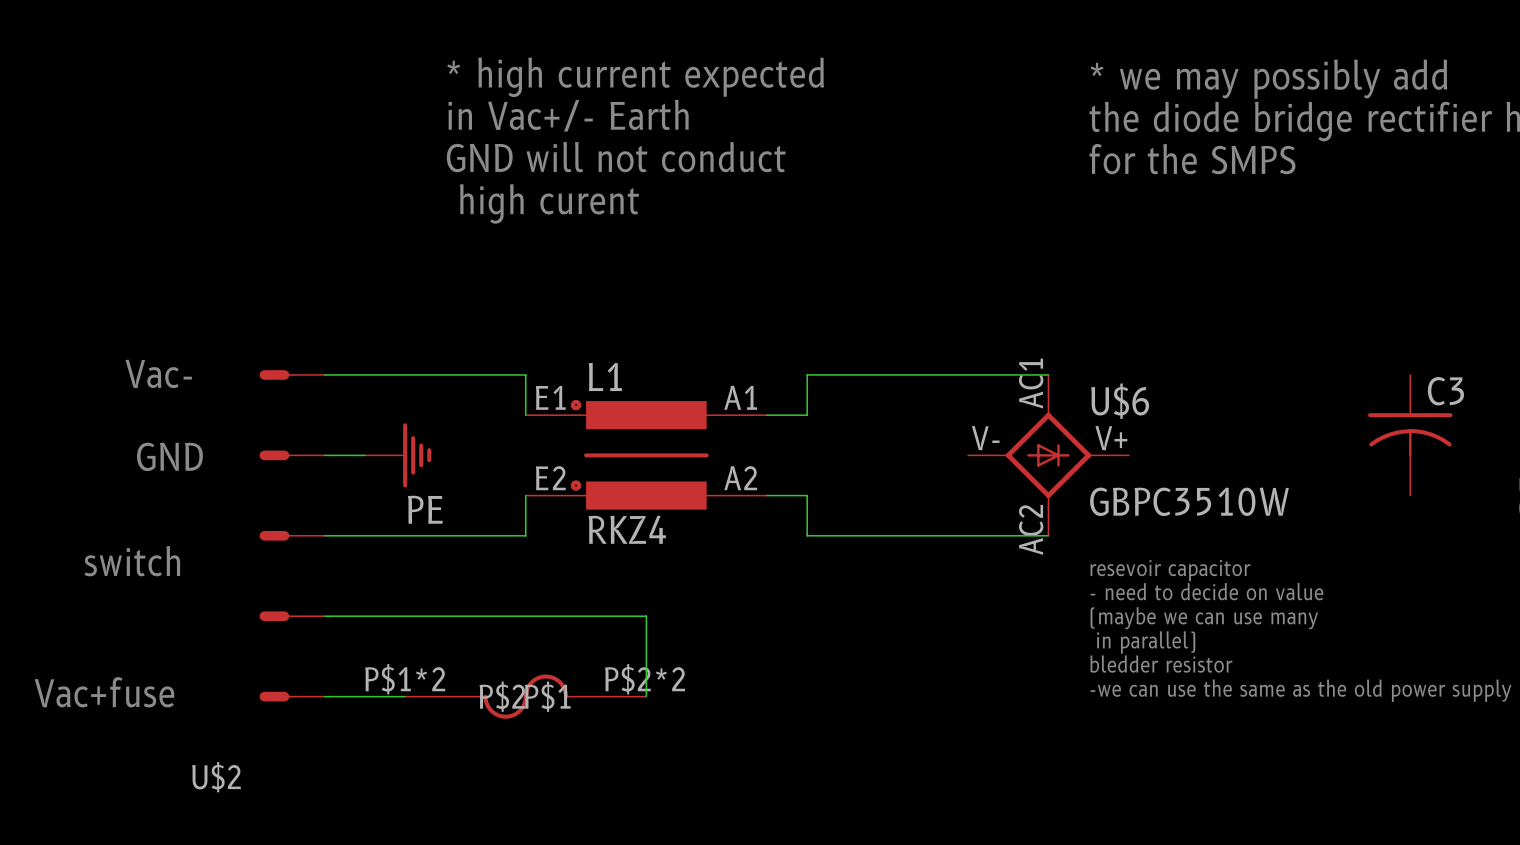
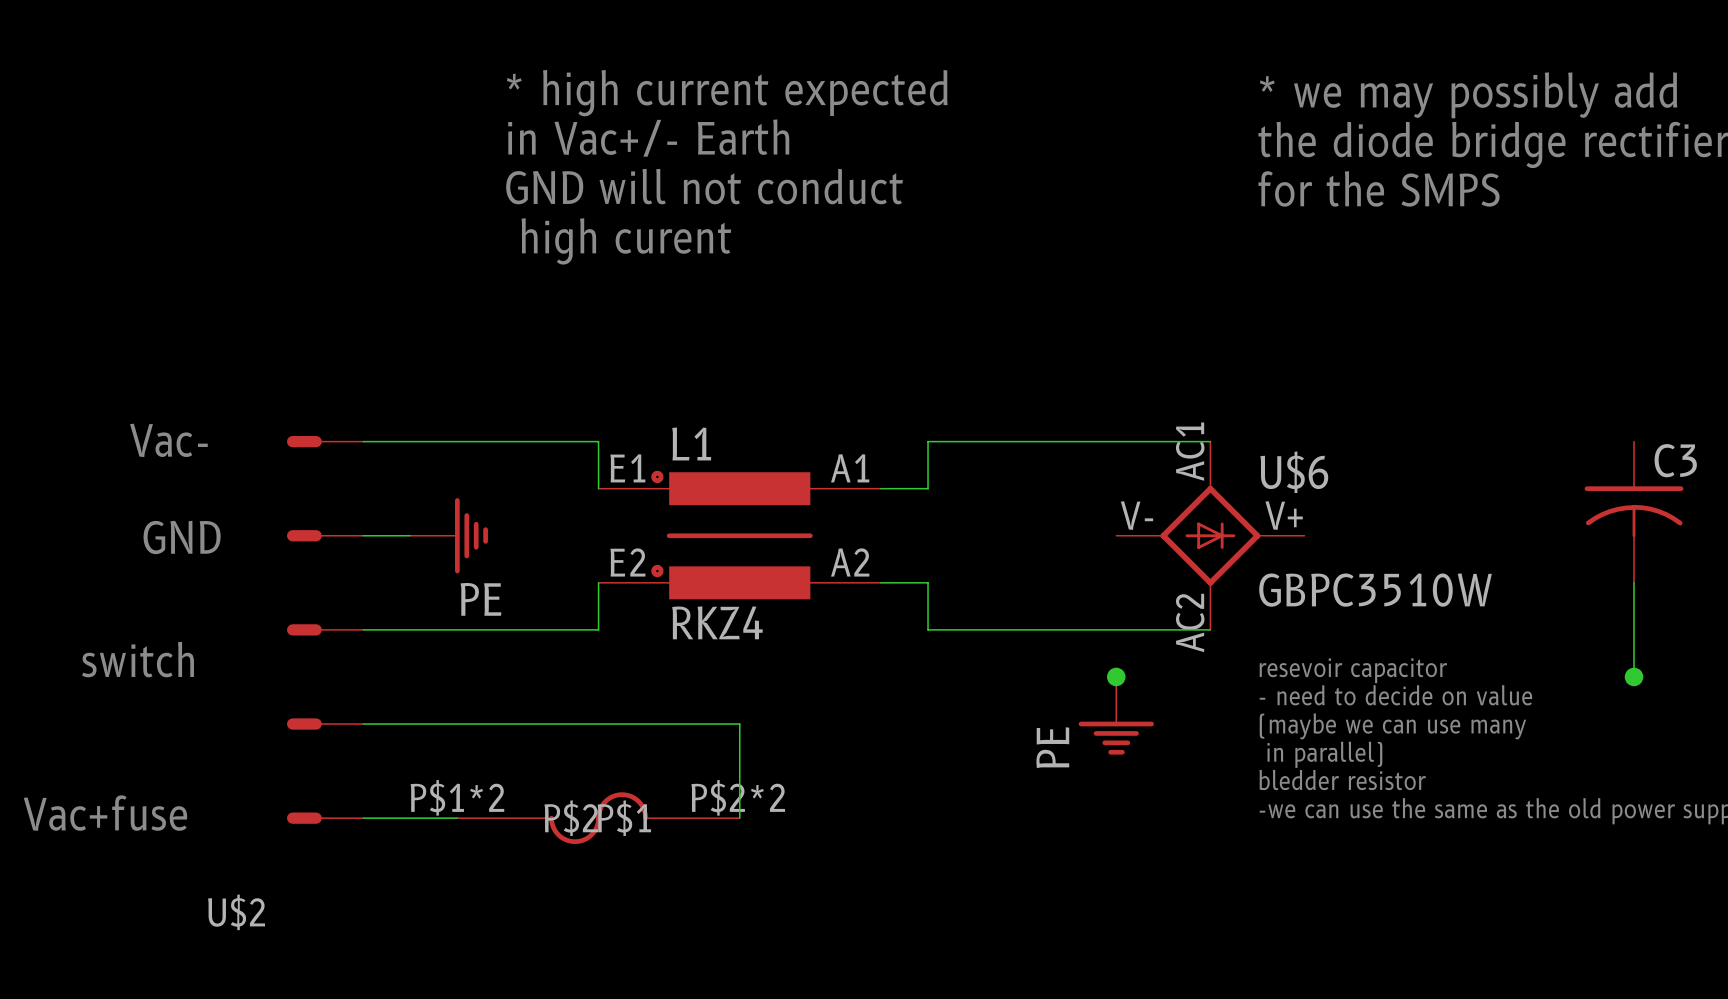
wire: none -> (1634, 582) (1634, 676)
junction: none -> (1116, 676)
junction: none -> (1634, 676)
power symbol: none -> PE (1116, 715)

